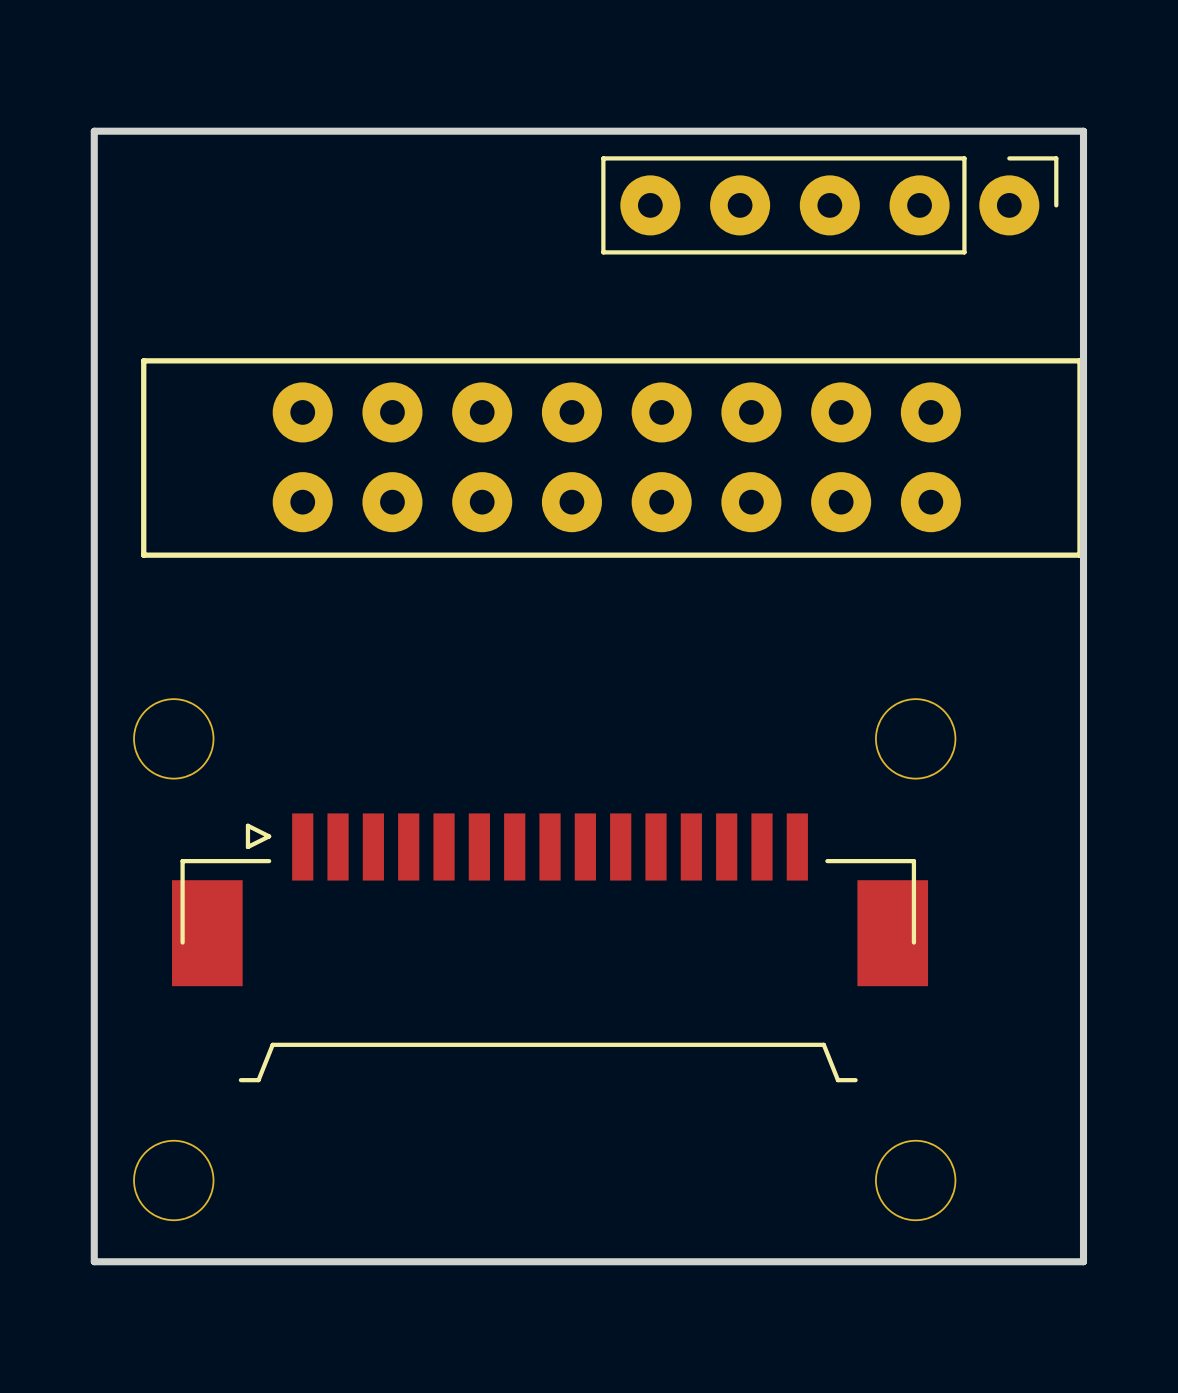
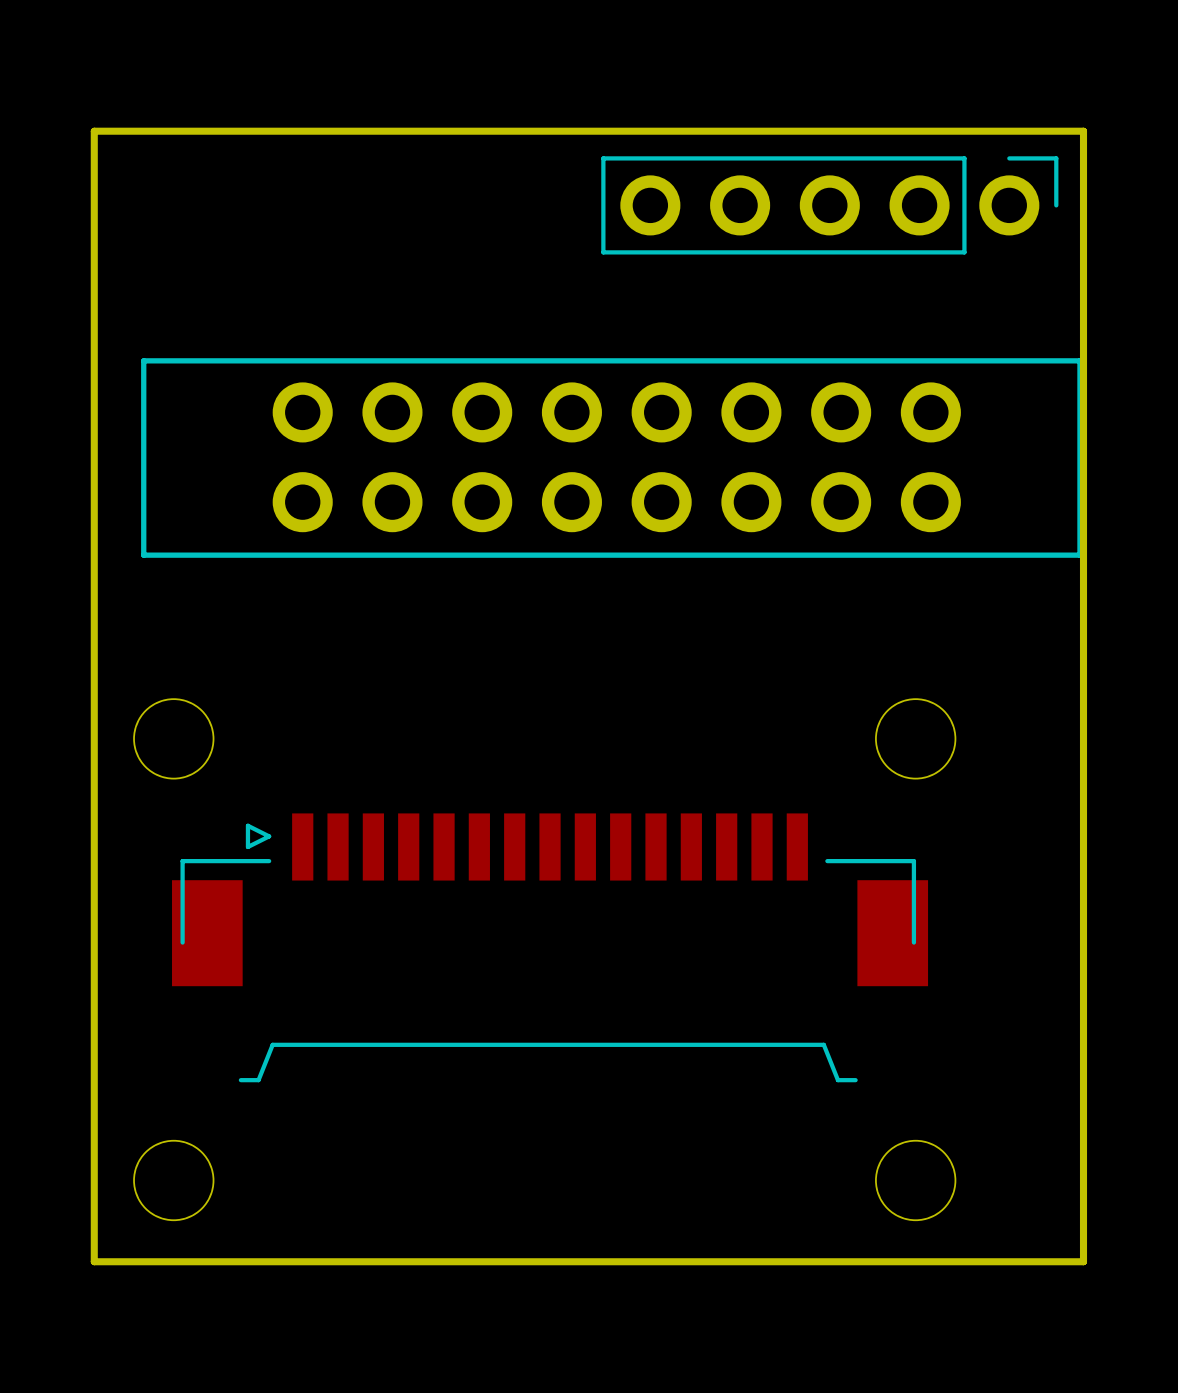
part footprint: [601, 156, 1059, 255] -> [601, 156, 1059, 255]
part footprint: [141, 358, 1083, 558] -> [141, 358, 1083, 558]

